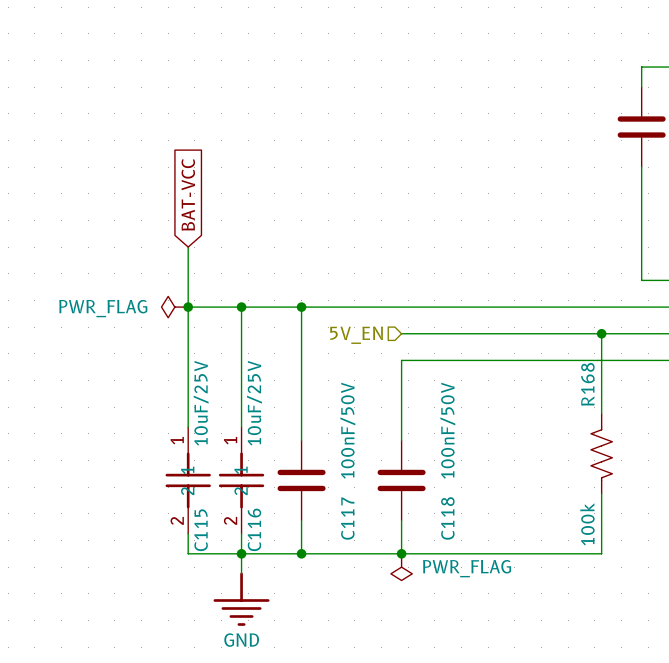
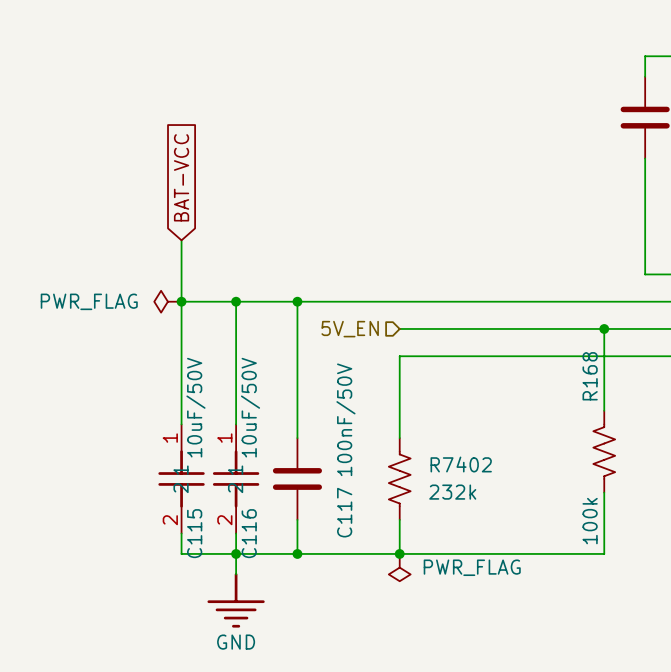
C115 value: 10uF/25V (201, 403) -> 10uF/50V (195, 407)
C116 value: 10uF/25V (254, 403) -> 10uF/50V (250, 407)
C118: 100nF/50V (401, 480) -> none
R7402: none -> 232k (399, 478)

